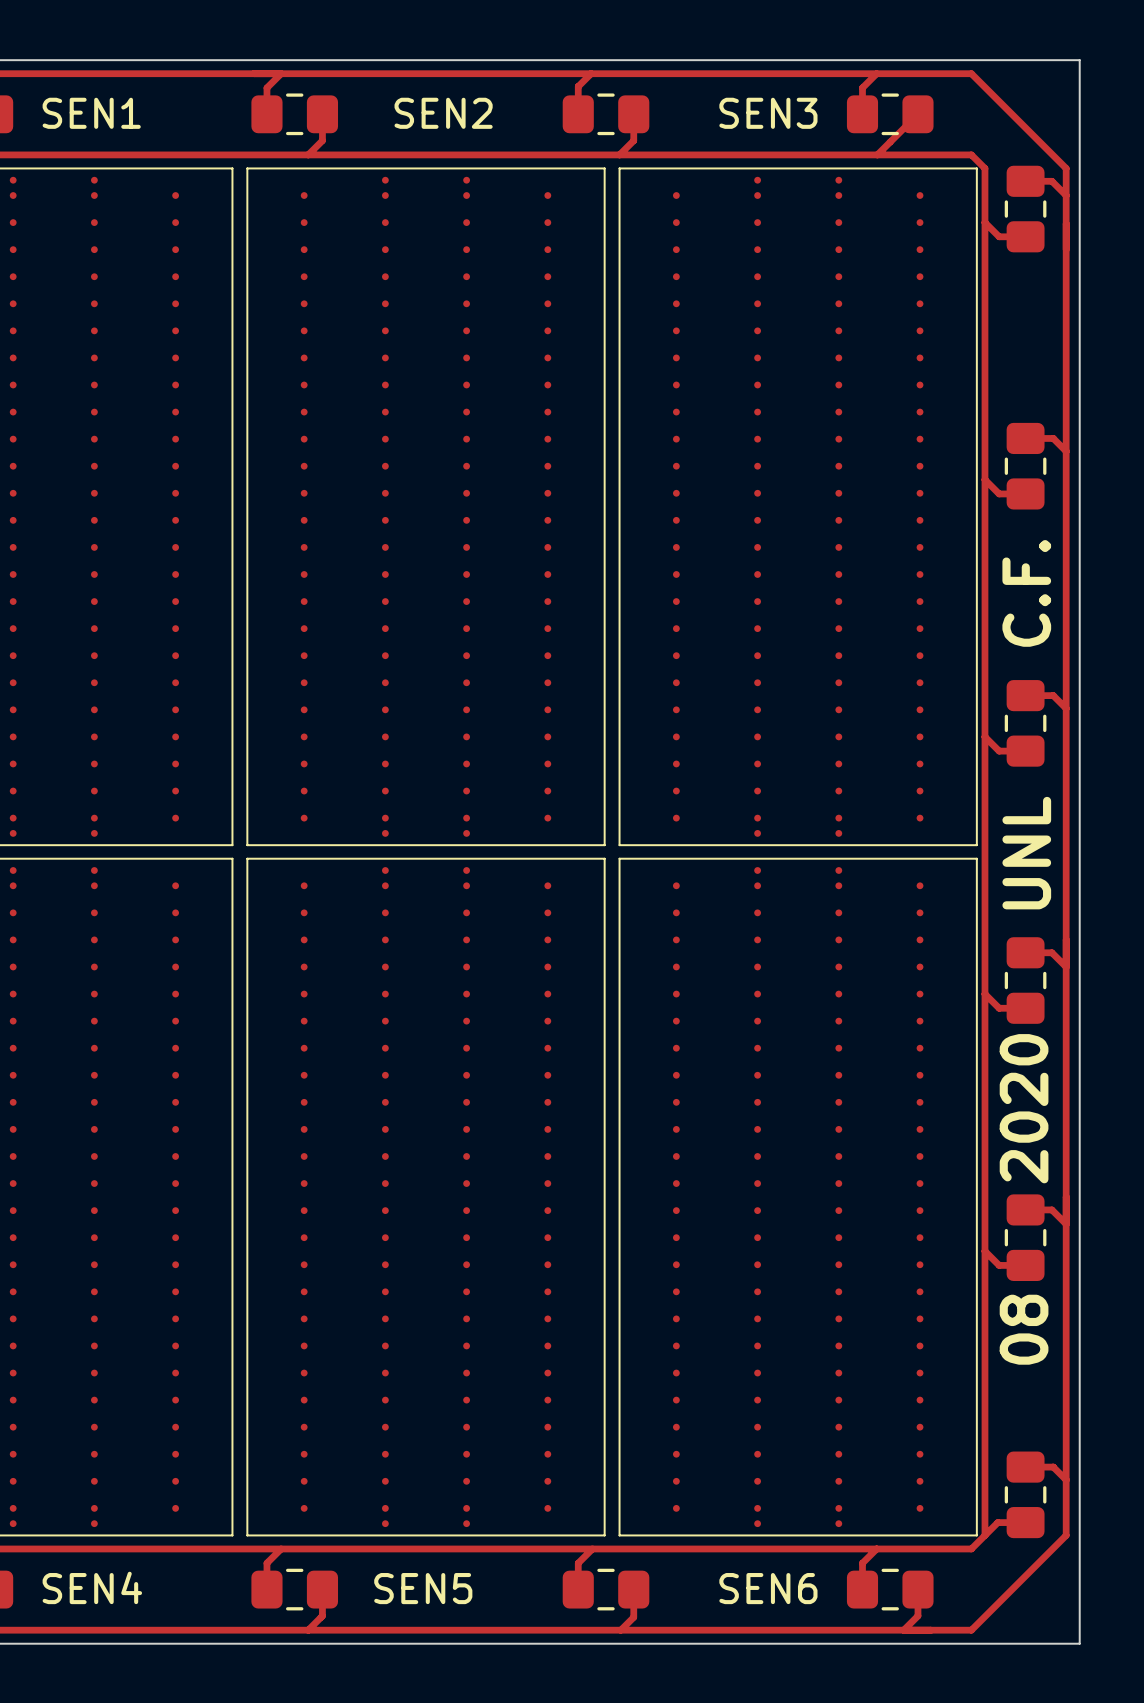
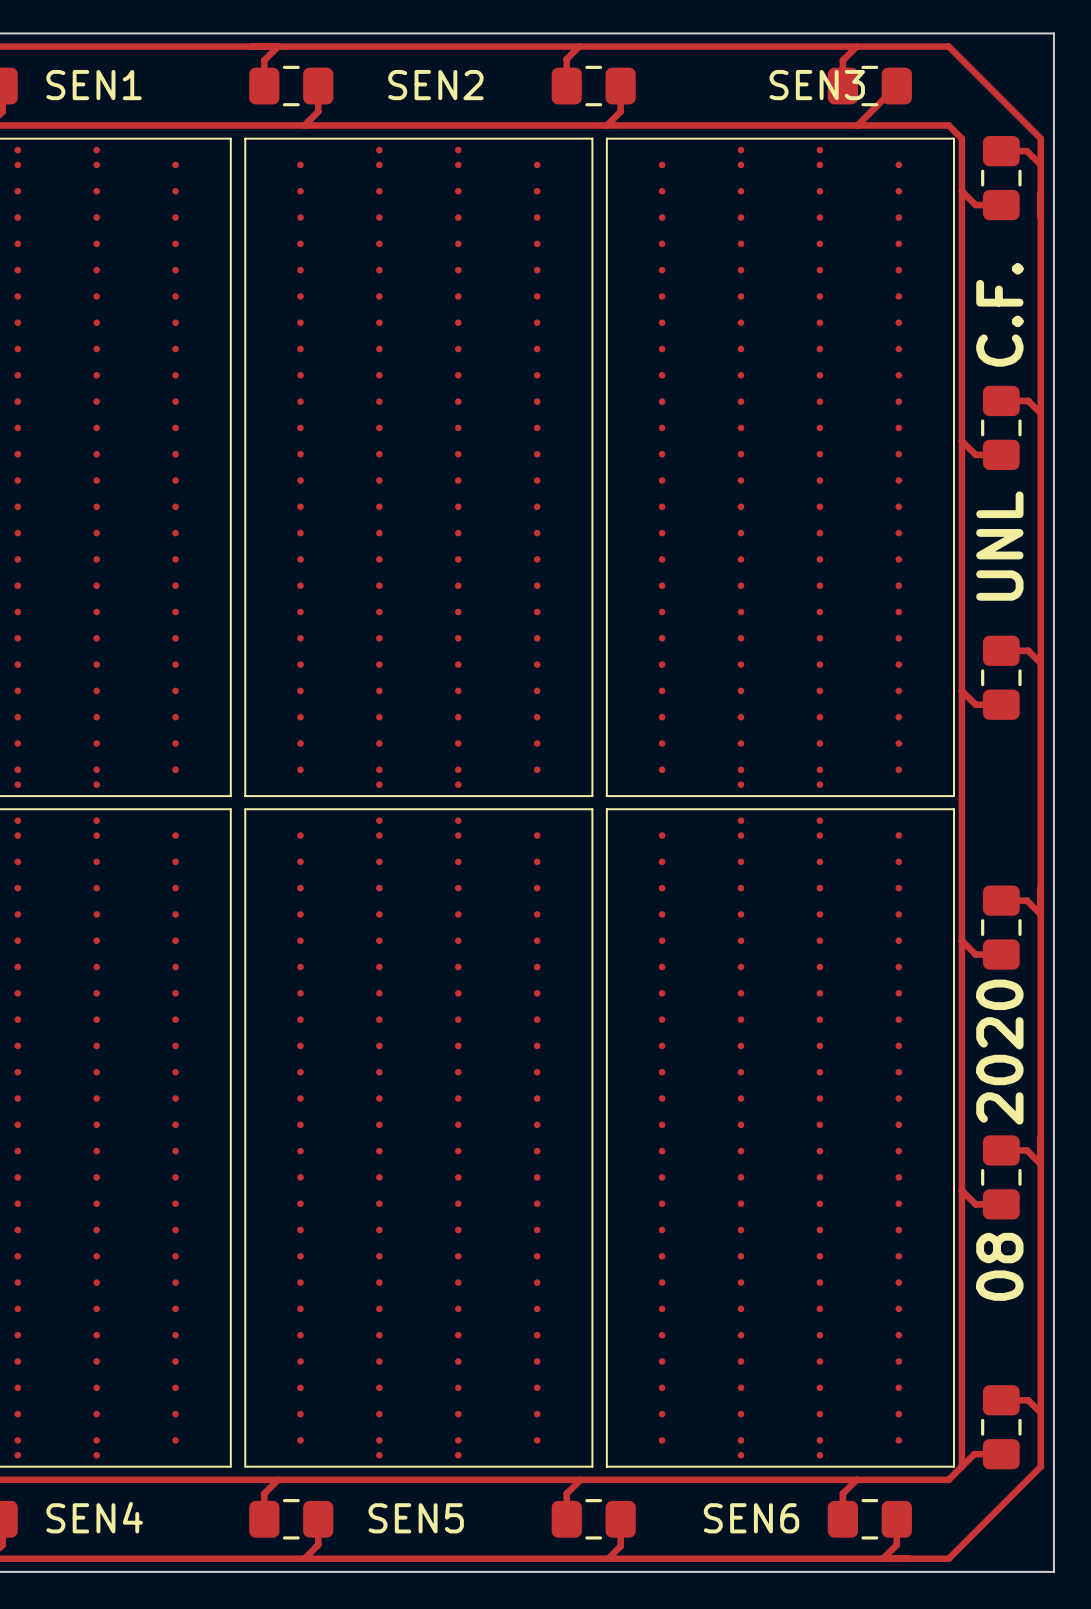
SEN3 name position: SEN3 (768, 113) -> SEN3 (817, 85)
text: none -> C.F. (999, 314)
text: C.F. (1026, 593) -> UNL (999, 546)
text: UNL (1026, 853) -> none

